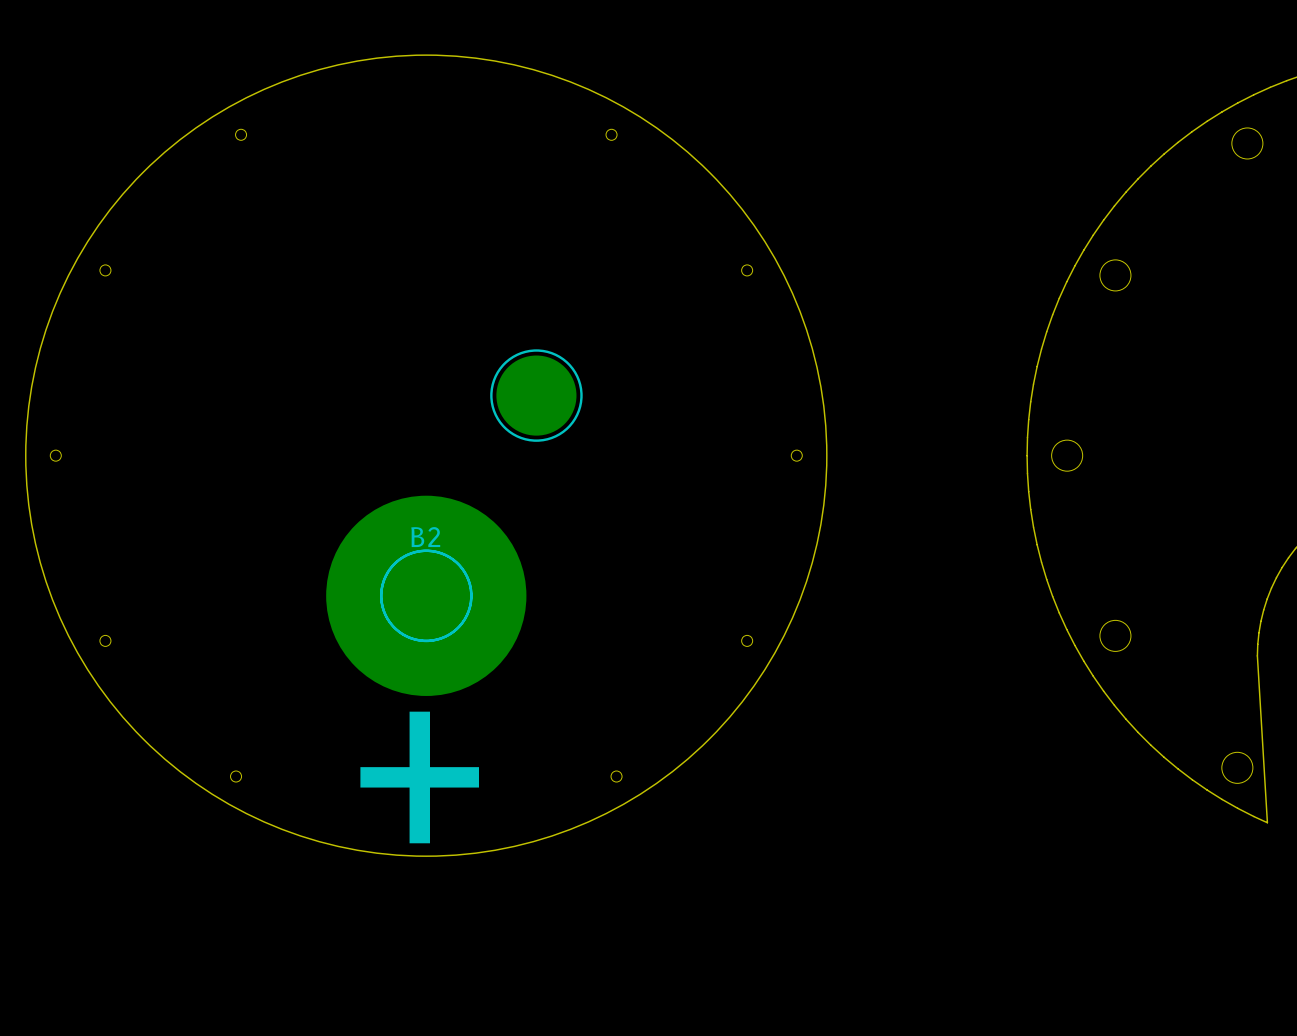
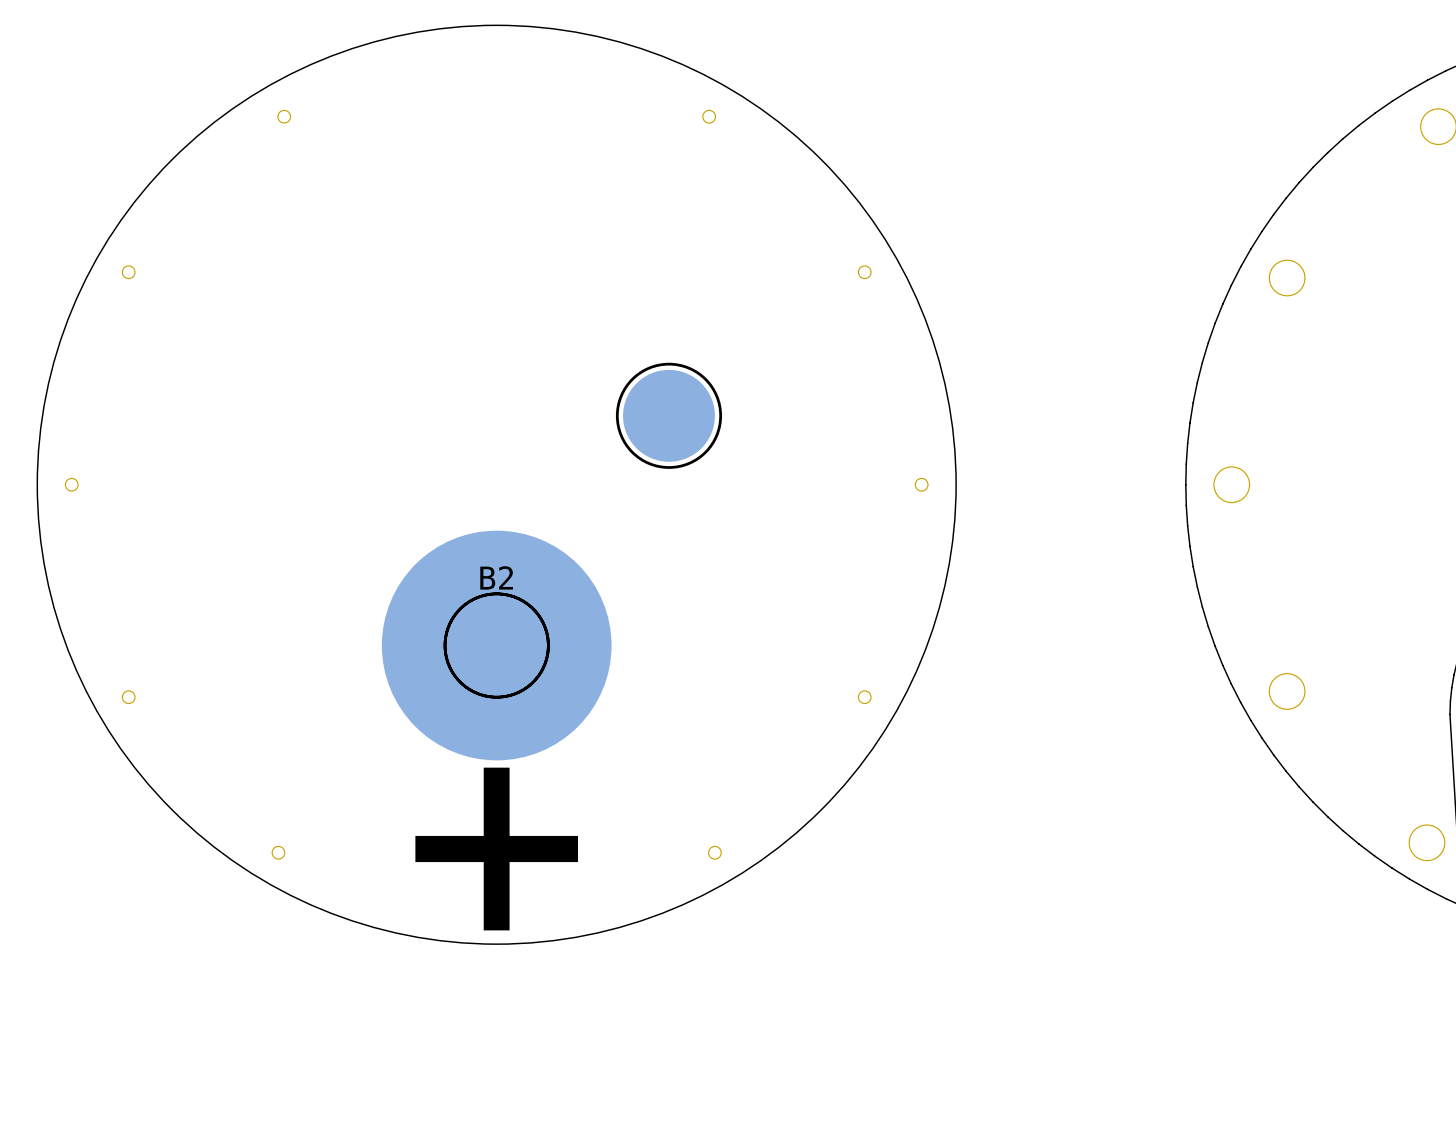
part position: (536, 395) -> (668, 415)

